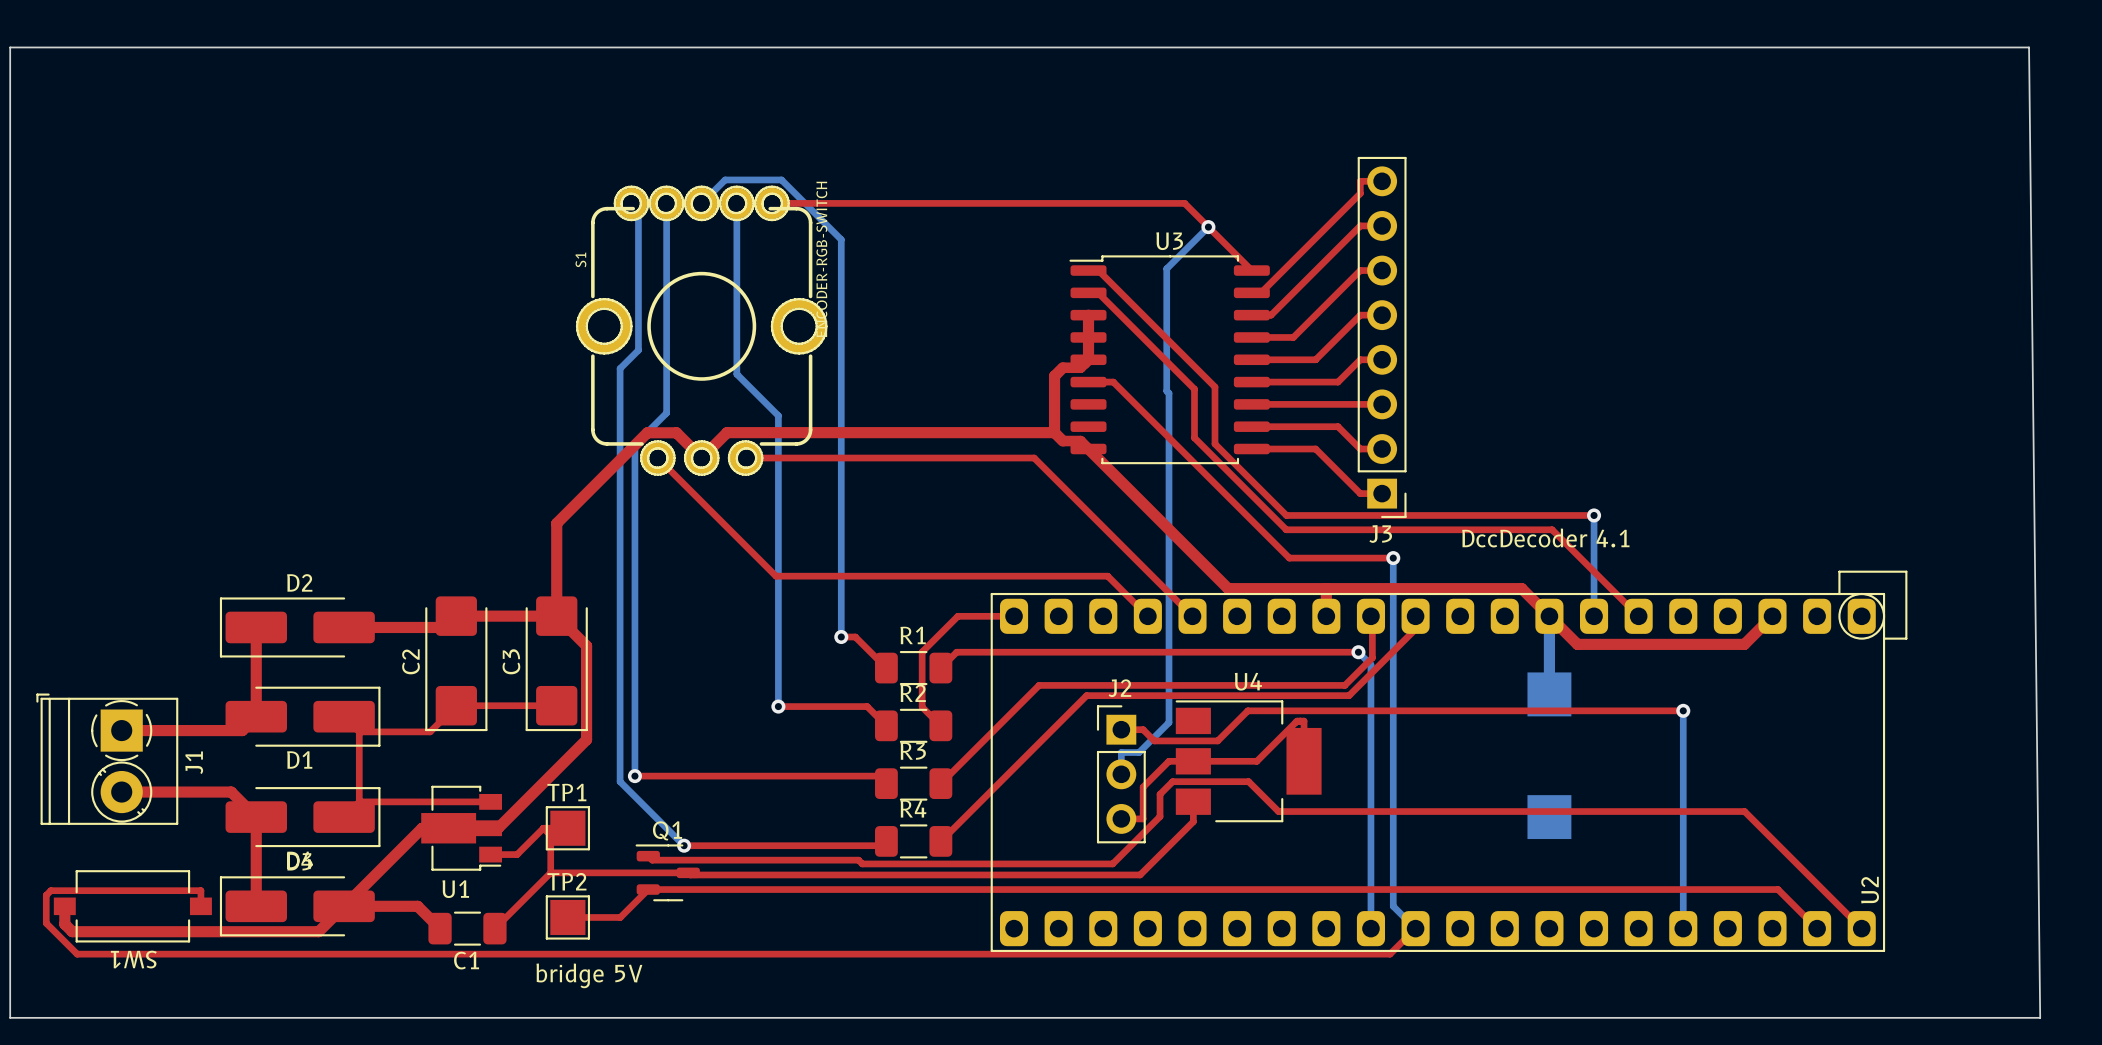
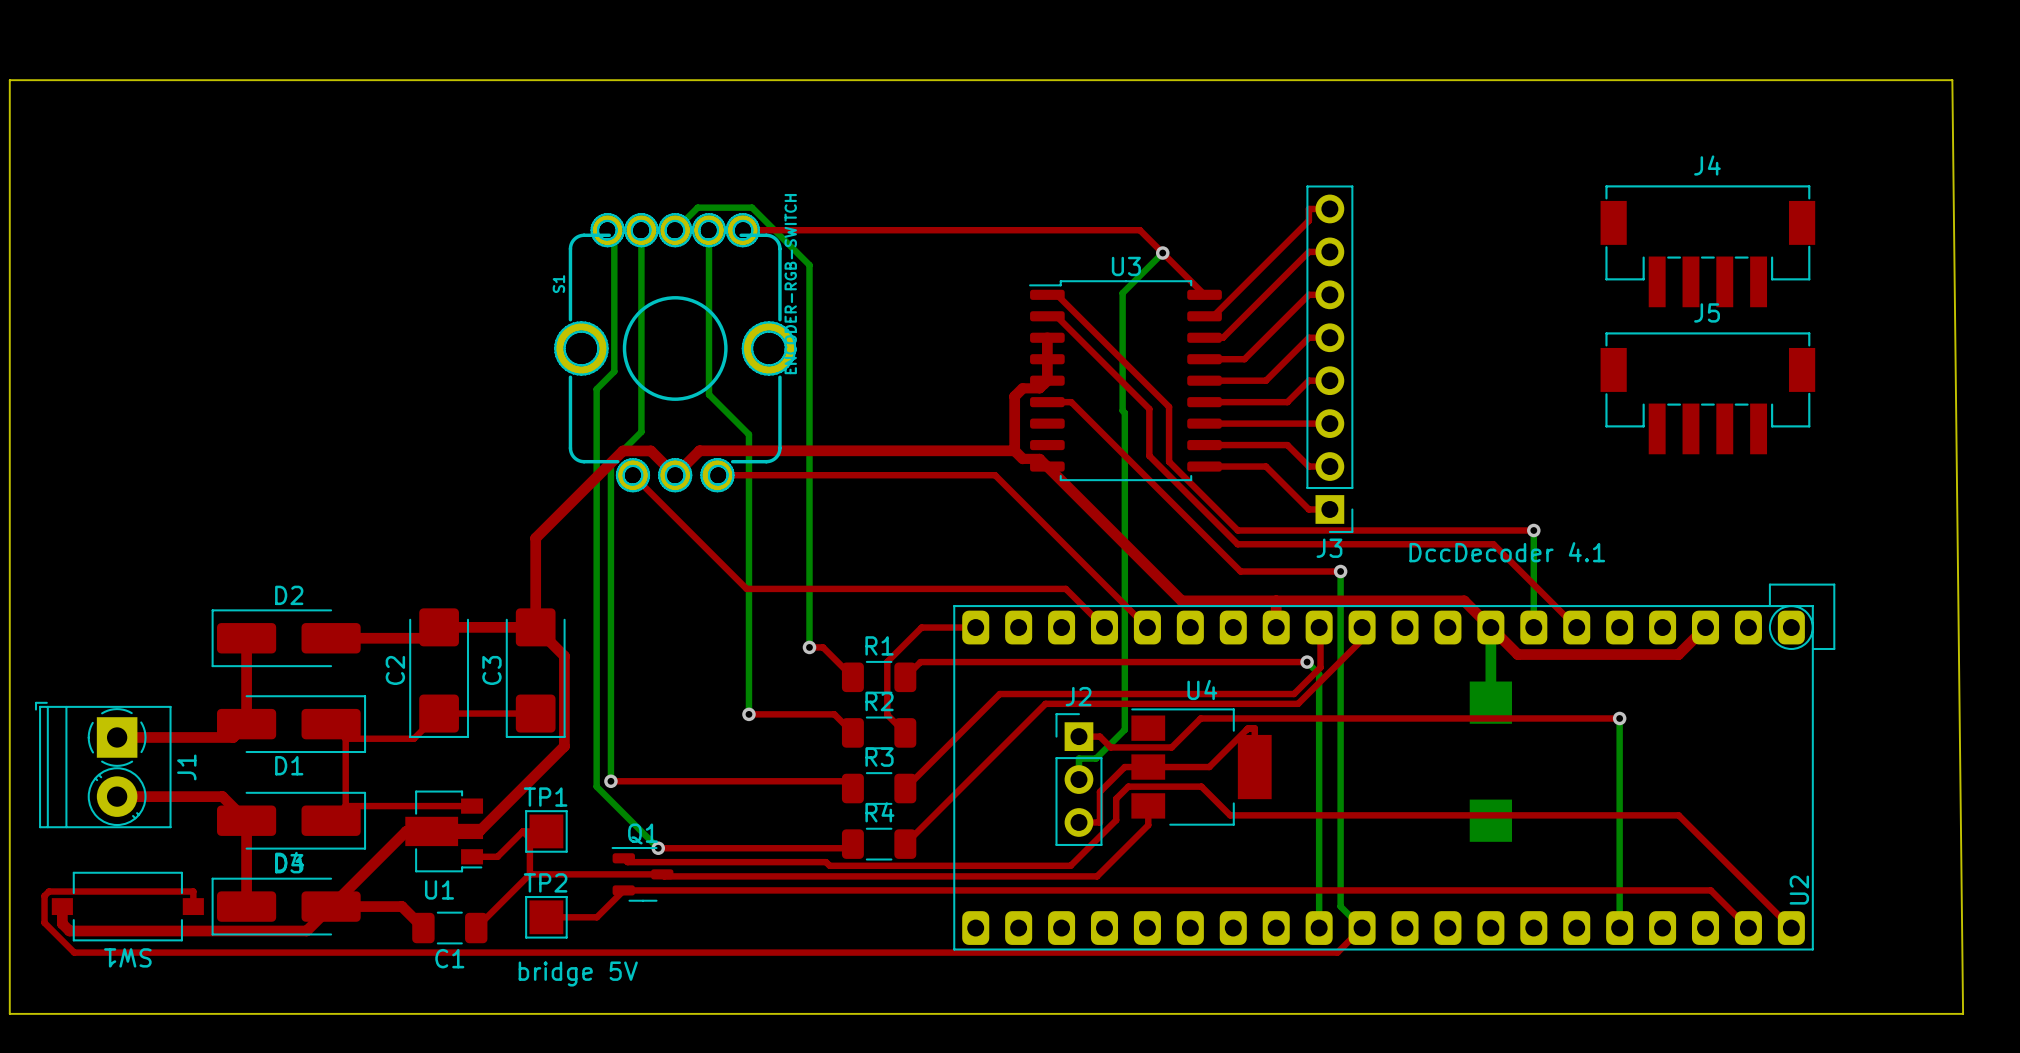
J4: none -> (1707, 246)
J5: none -> (1707, 393)

